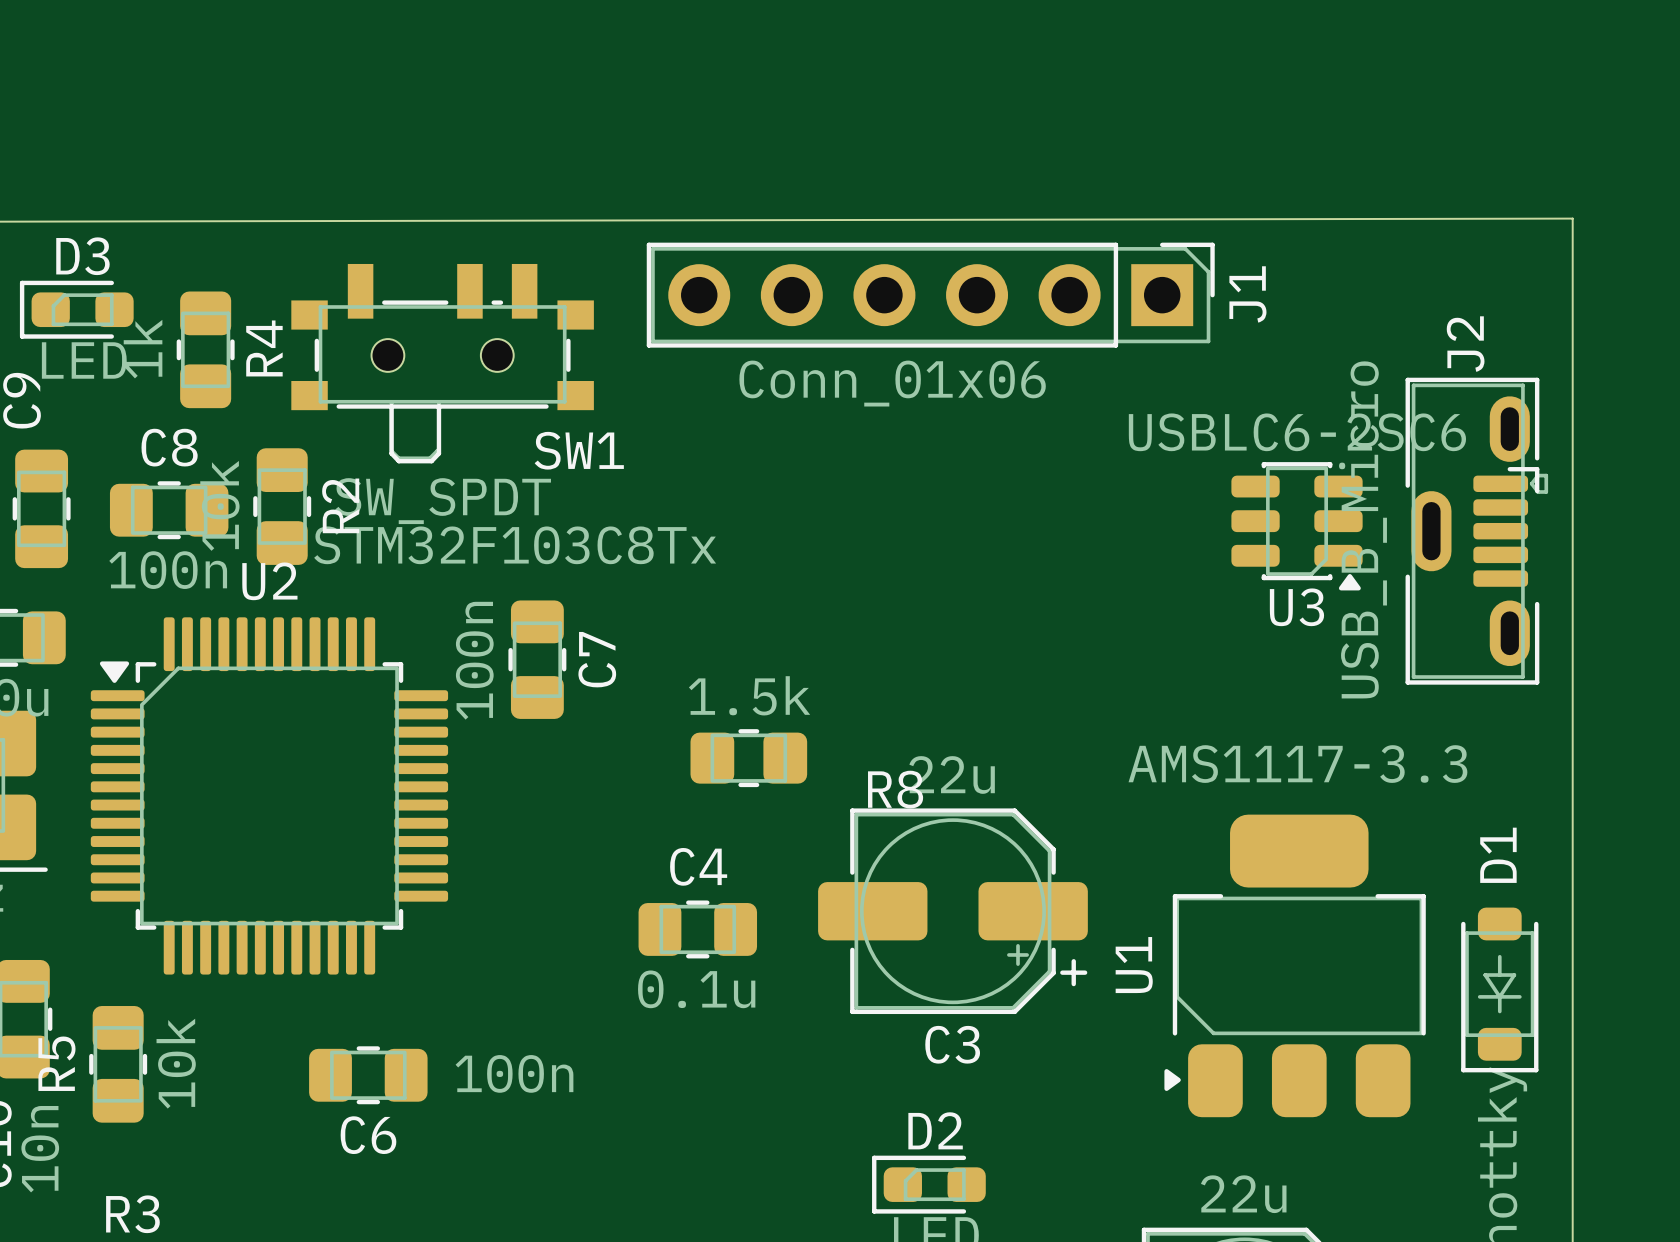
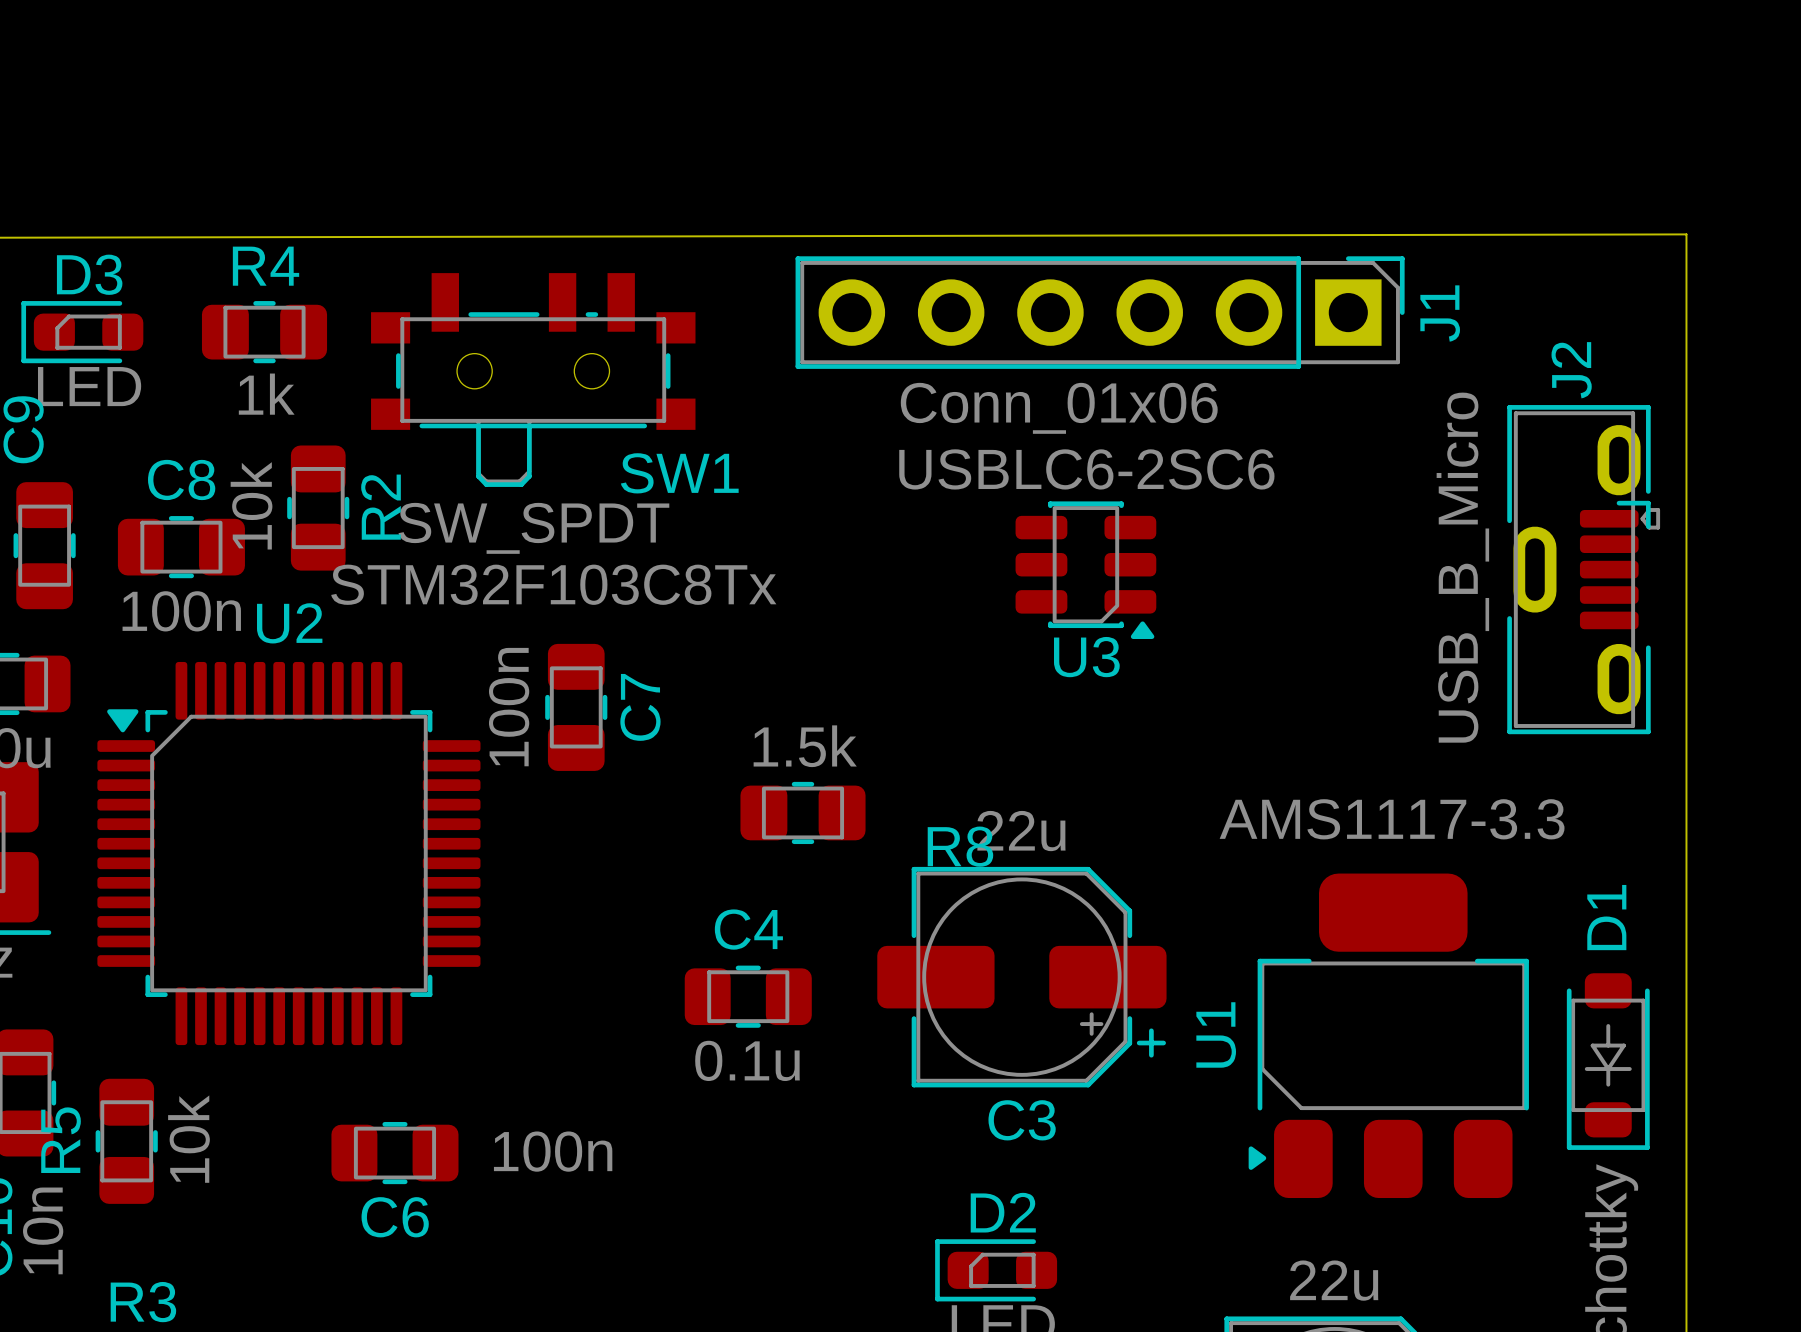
J1 position: (930, 295) -> (1100, 312)
R4 name position: R4 (264, 348) -> R4 (266, 266)
R4 value position: 1k (143, 349) -> 1k (266, 394)
R4 rotation: 0° (205, 349) -> 90° clockwise (264, 332)
SW1 position: (442, 363) -> (533, 380)
R2 position: (282, 506) -> (318, 508)
U3 position: (1297, 526) -> (1085, 570)

